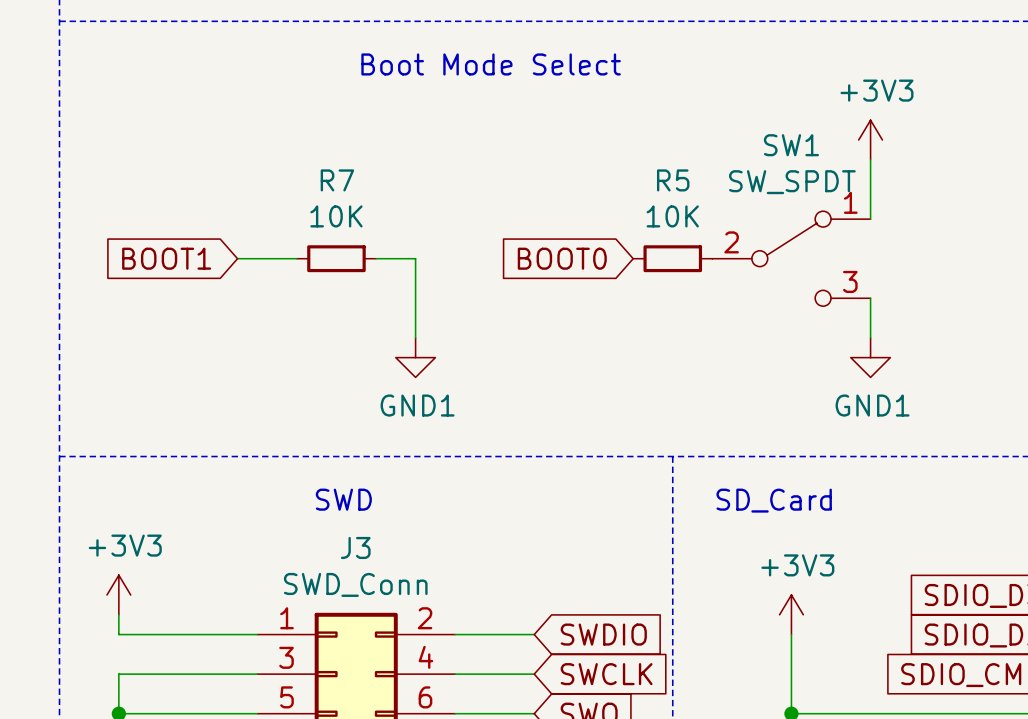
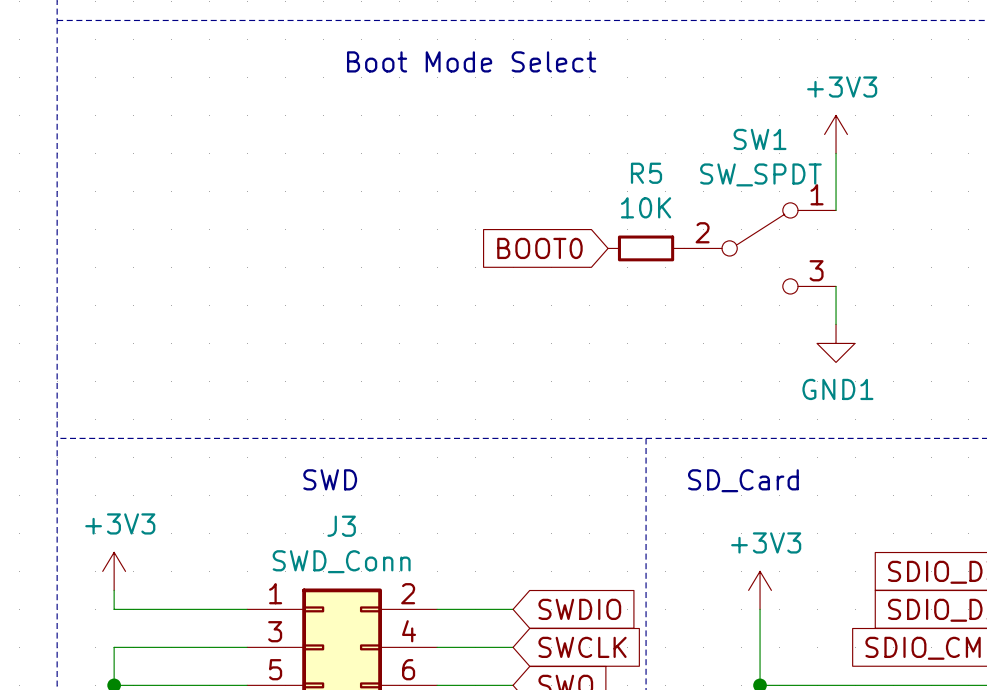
global label: BOOT1 (166, 258) -> none
wire: (237, 258) (296, 258) -> none
R7: 10K (336, 258) -> none
wire: (376, 258) (415, 258) (415, 337) -> none
power symbol: GND1 (415, 357) -> none

